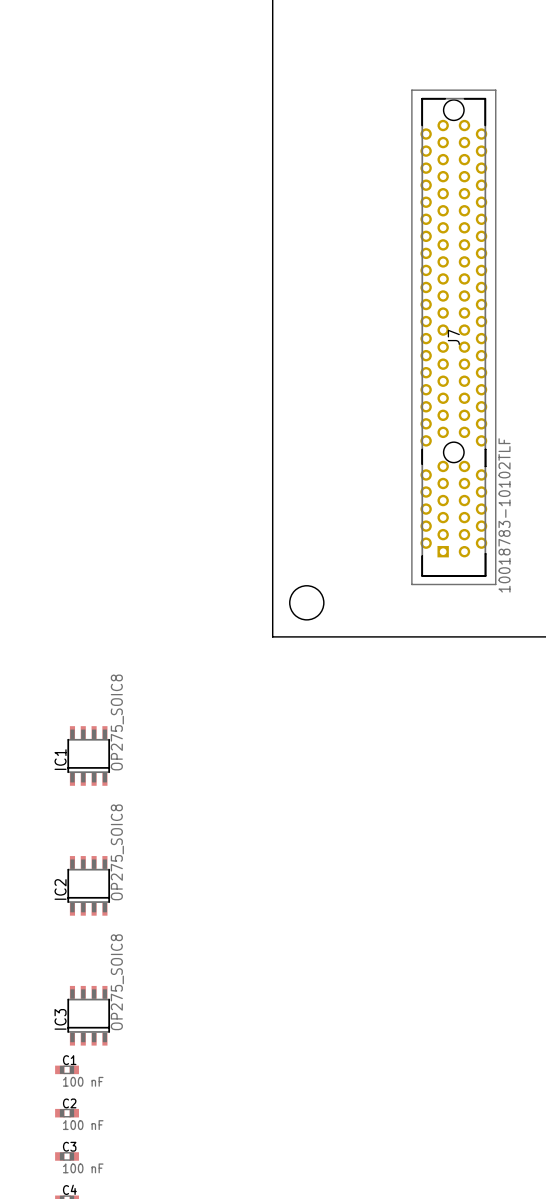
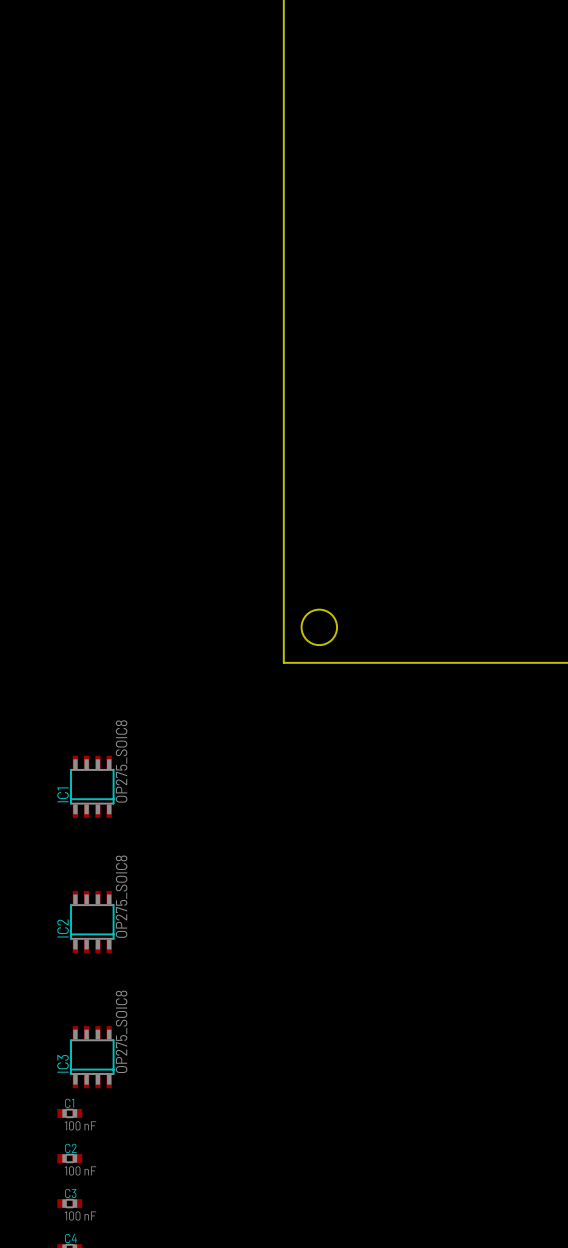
J7: 10018783-10102TLF (453, 337) -> none

